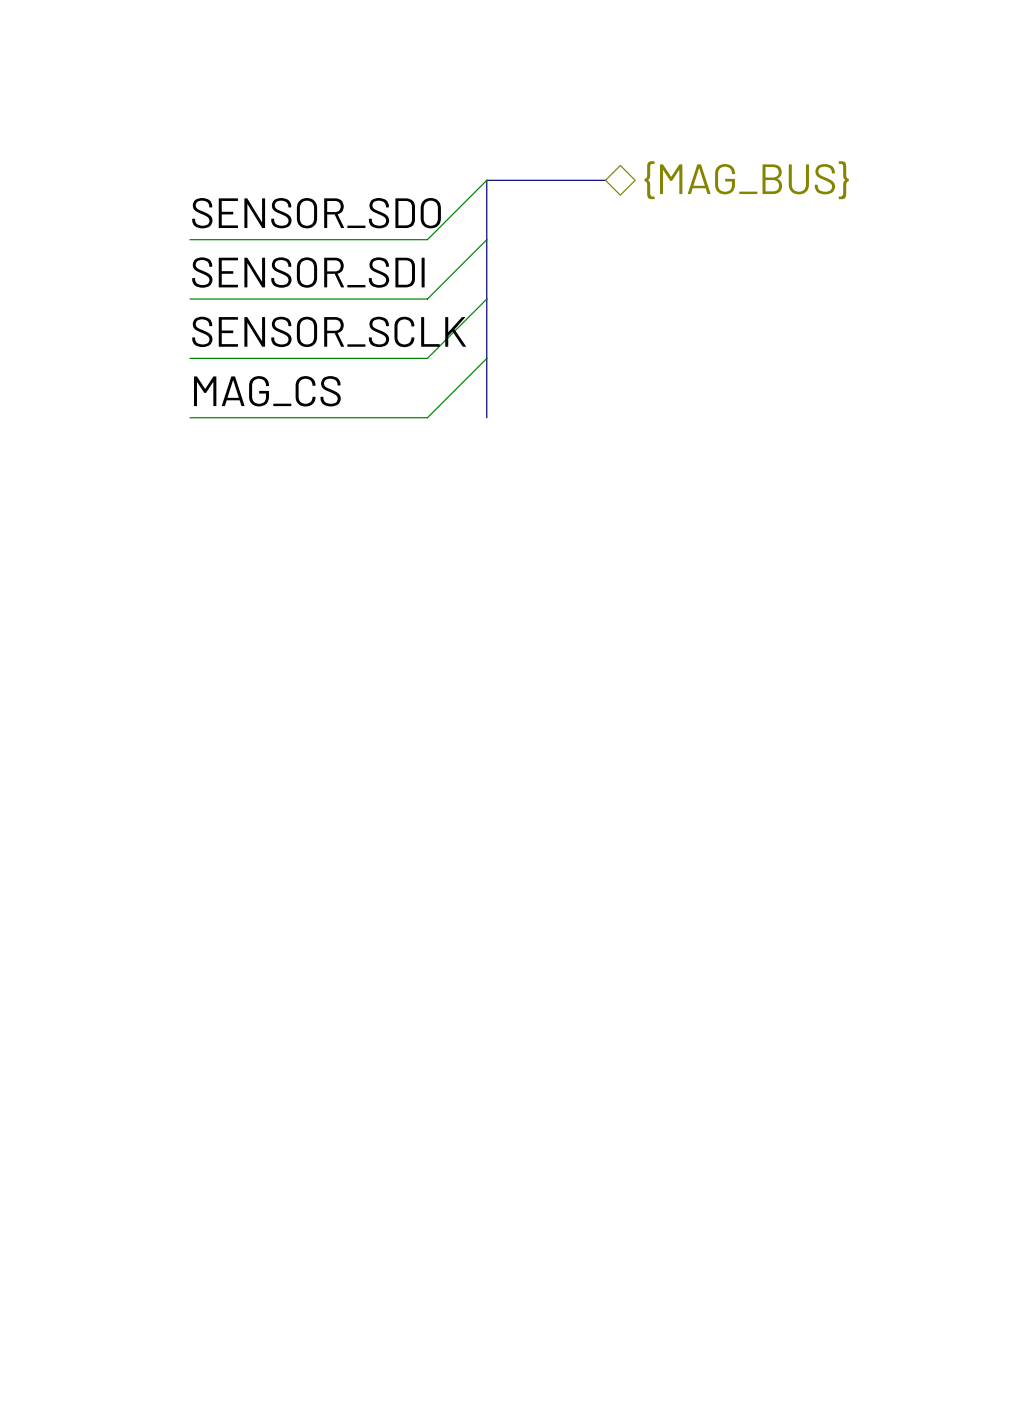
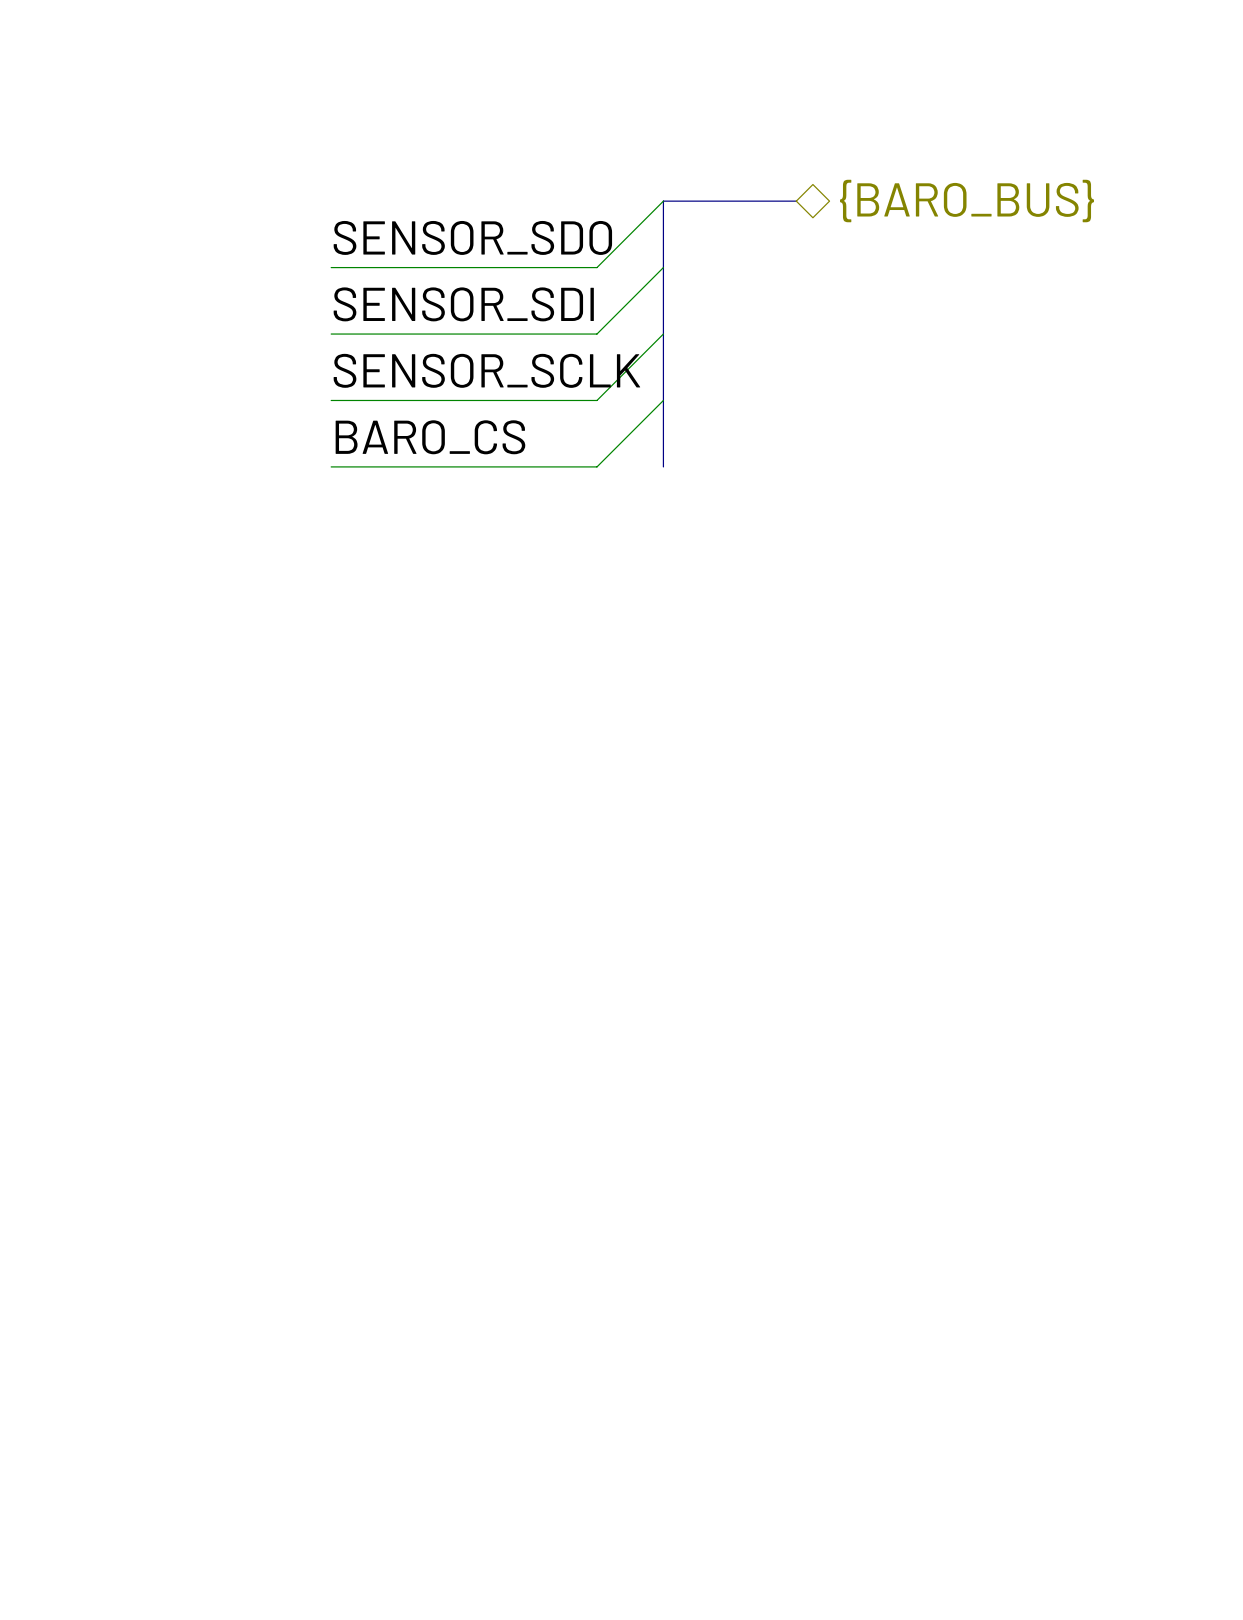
hierarchical label: {MAG_BUS} (746, 180) -> {BARO_BUS} (967, 201)
label: MAG_CS (267, 391) -> BARO_CS (430, 437)

